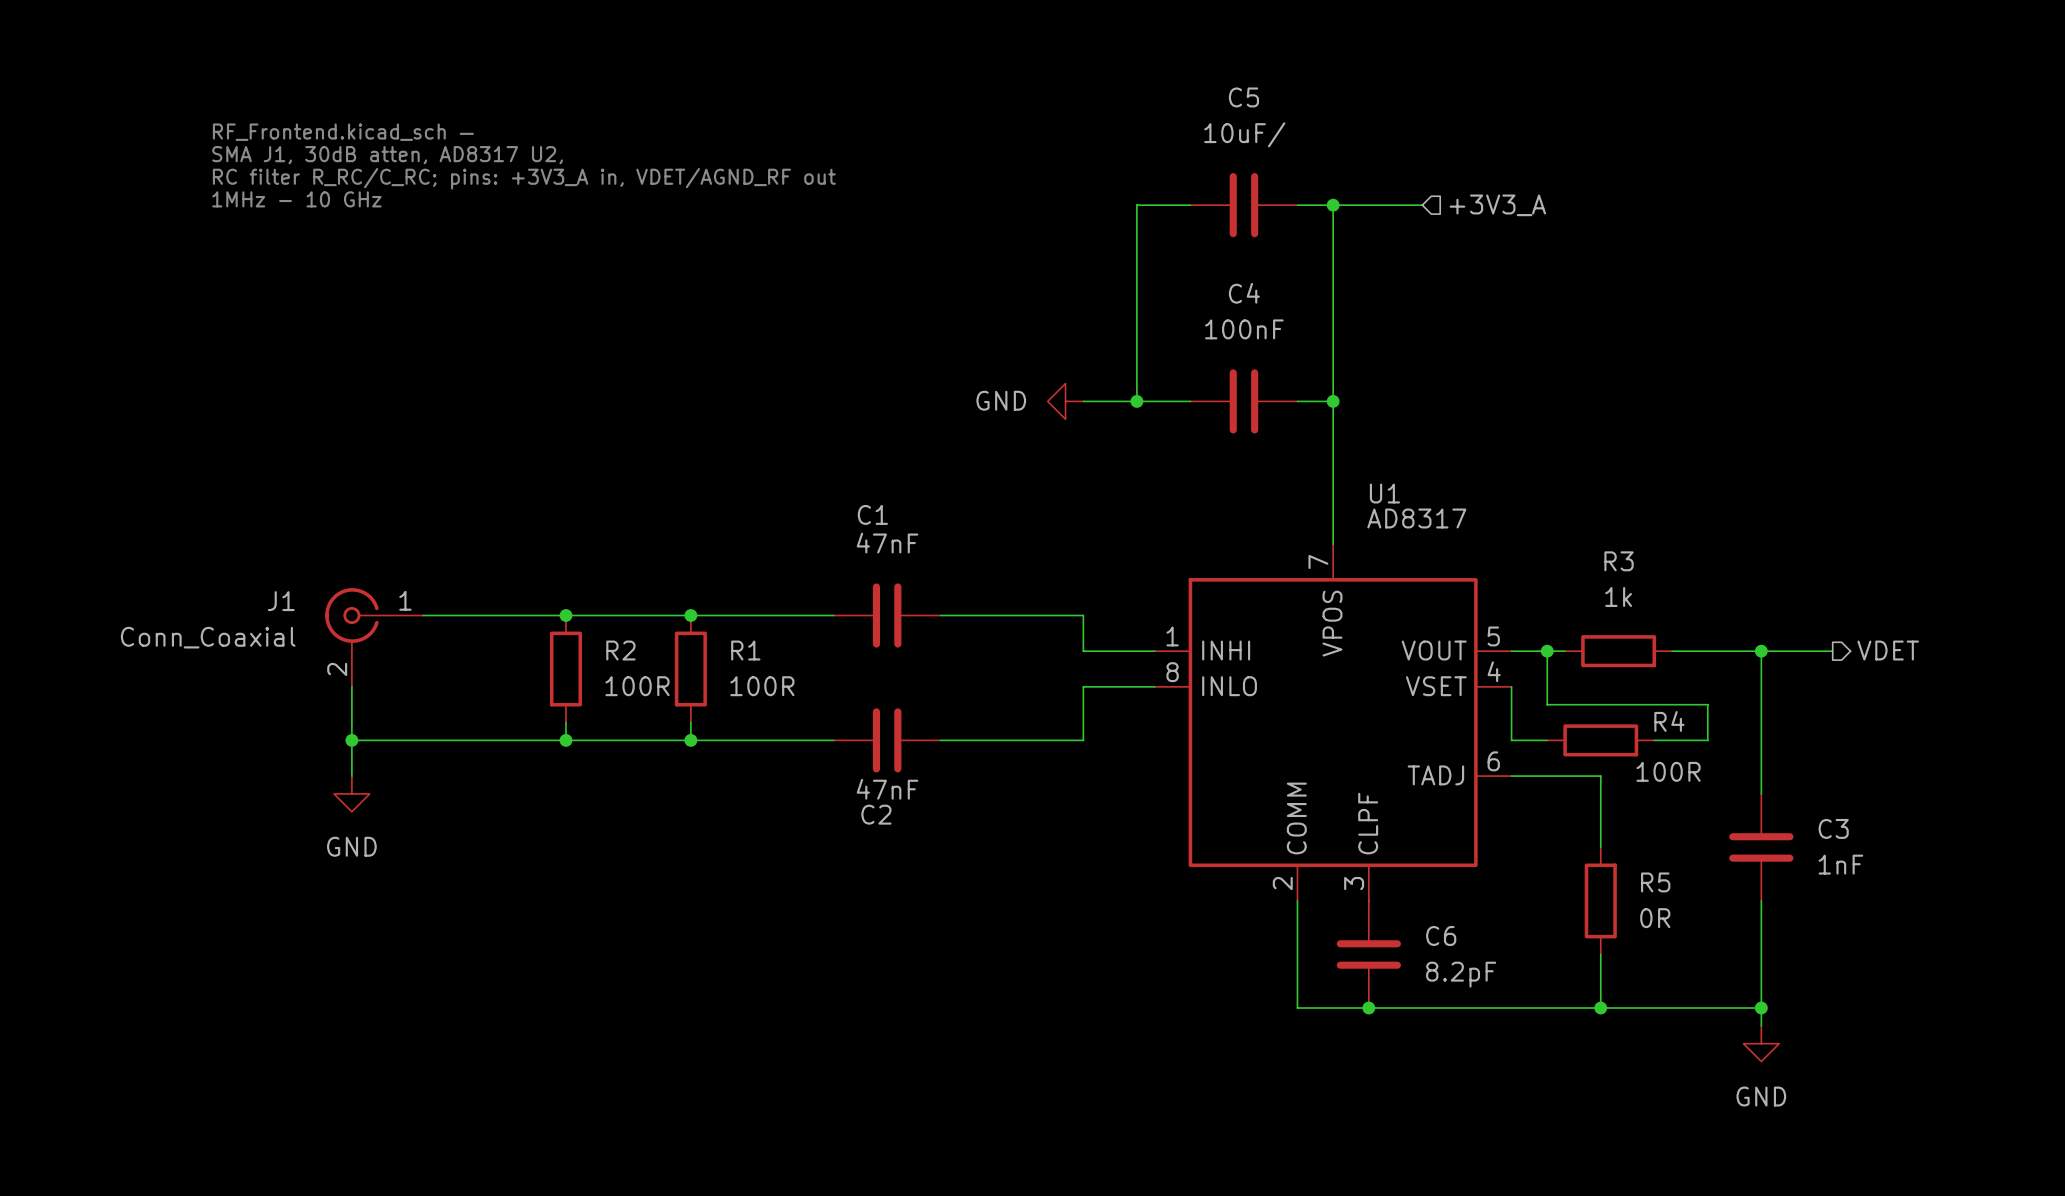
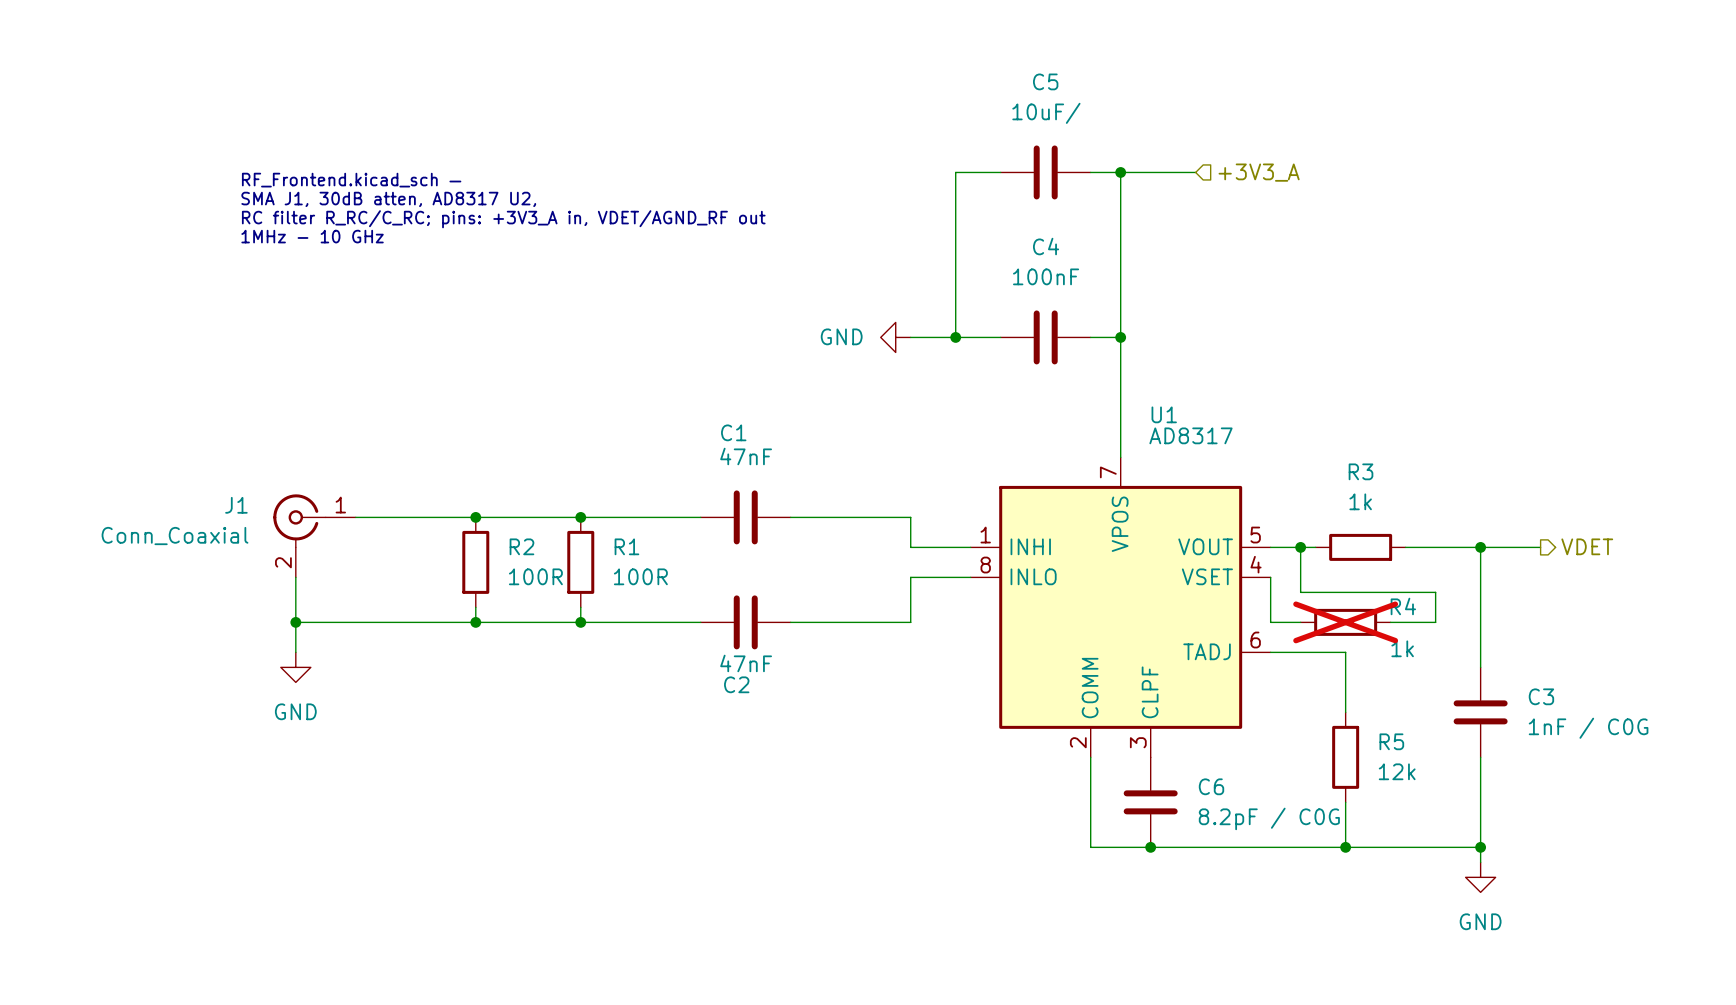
text position: RF_Frontend.kicad_sch — (343, 132) -> RF_Frontend.kicad_sch — (351, 180)
text position: SMA J1, 30dB atten, AD8317 U2, (387, 155) -> SMA J1, 30dB atten, AD8317 U2, (388, 199)
text position: RC filter R_RC/C_RC; pins: +3V3_A in, VDET/AGND_RF out (524, 178) -> RC filter R_RC/C_RC; pins: +3V3_A in, VDET/AGND_RF out (503, 219)
text position: 1MHz - 10 GHz (296, 199) -> 1MHz - 10 GHz (312, 236)
R4 do-not-place cross: none -> (1345, 622)
R4 value: 100R (1668, 771) -> 1k (1402, 648)
C3 value: 1nF (1840, 864) -> 1nF / C0G (1588, 728)
R5 value: 0R (1655, 918) -> 12k (1397, 771)
C6 value: 8.2pF (1461, 974) -> 8.2pF / C0G (1269, 818)

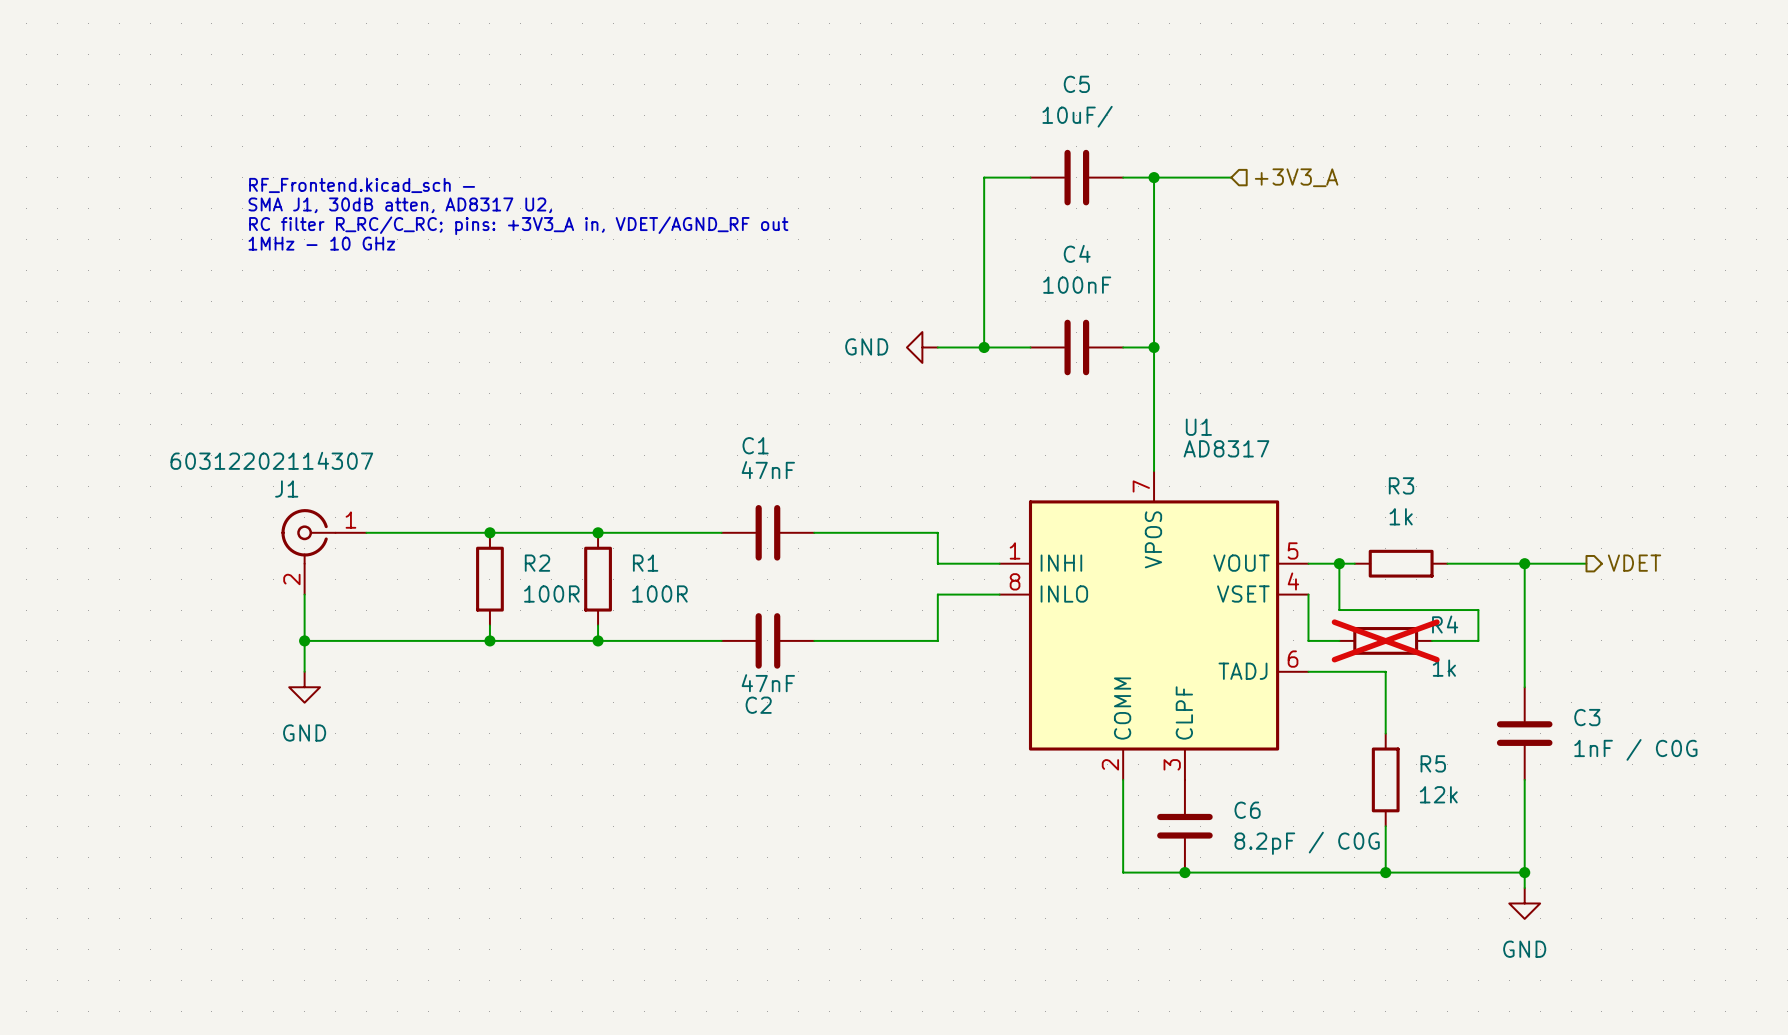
J1 name position: J1 (236, 505) -> J1 (286, 488)
J1 value: Conn_Coaxial (175, 536) -> 60312202114307 (271, 460)

